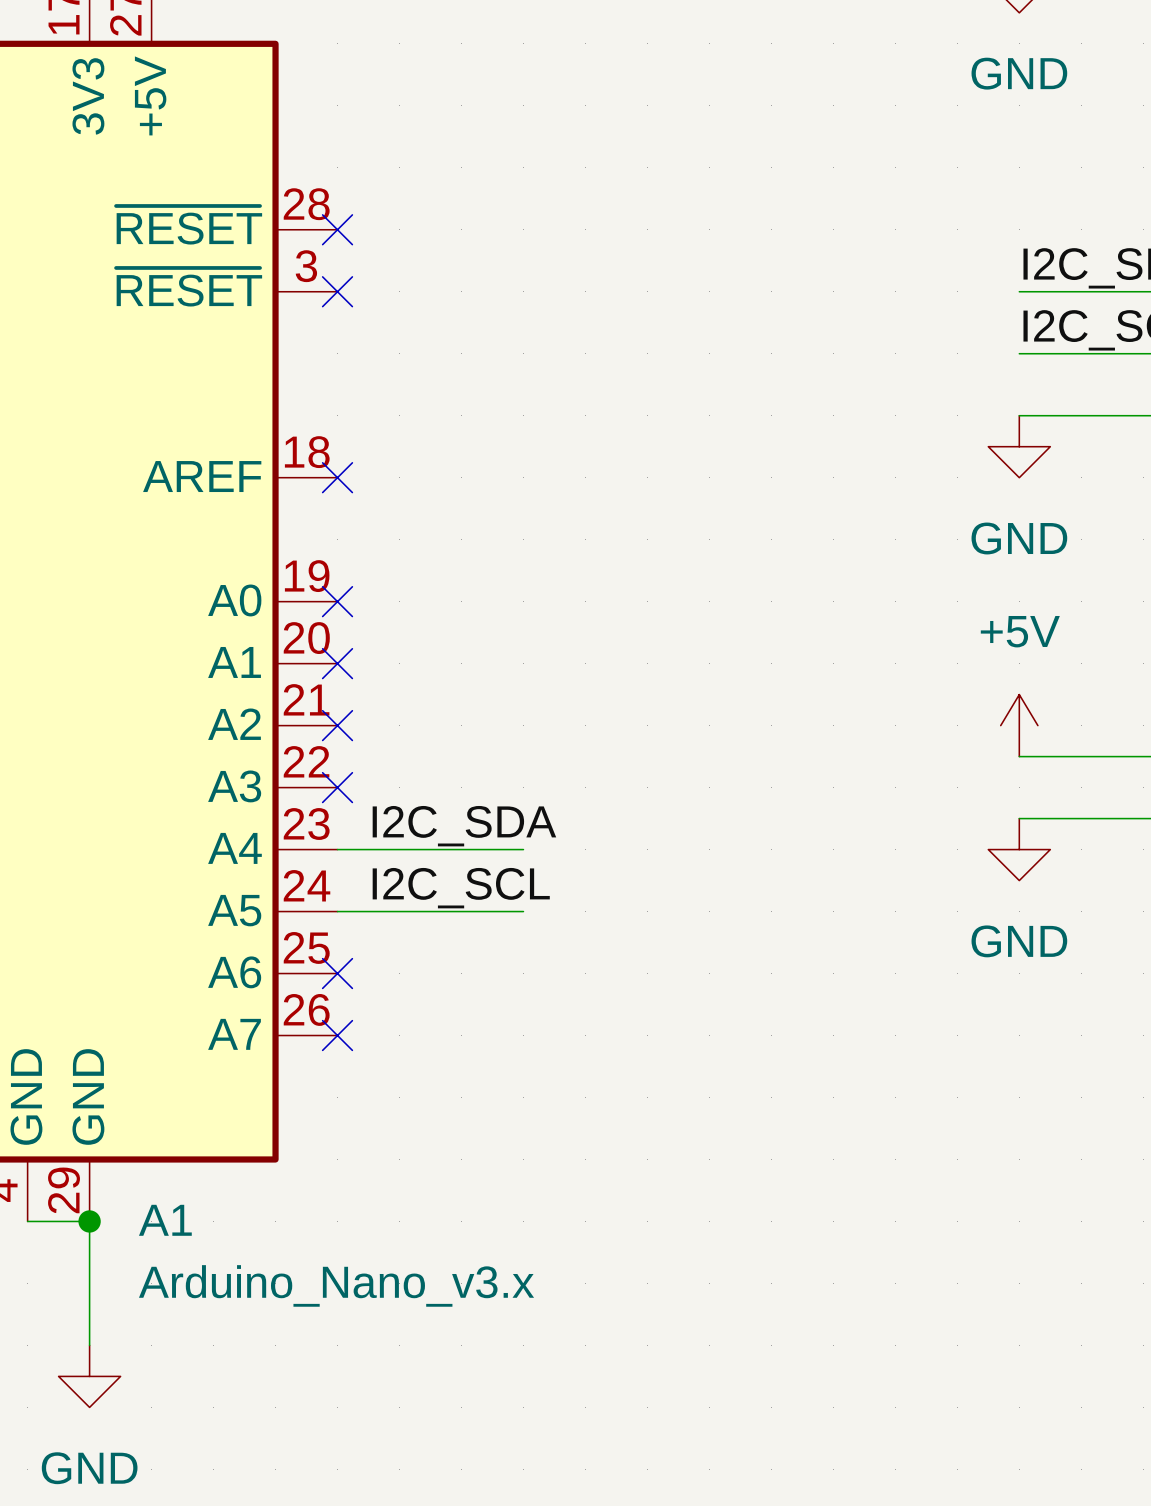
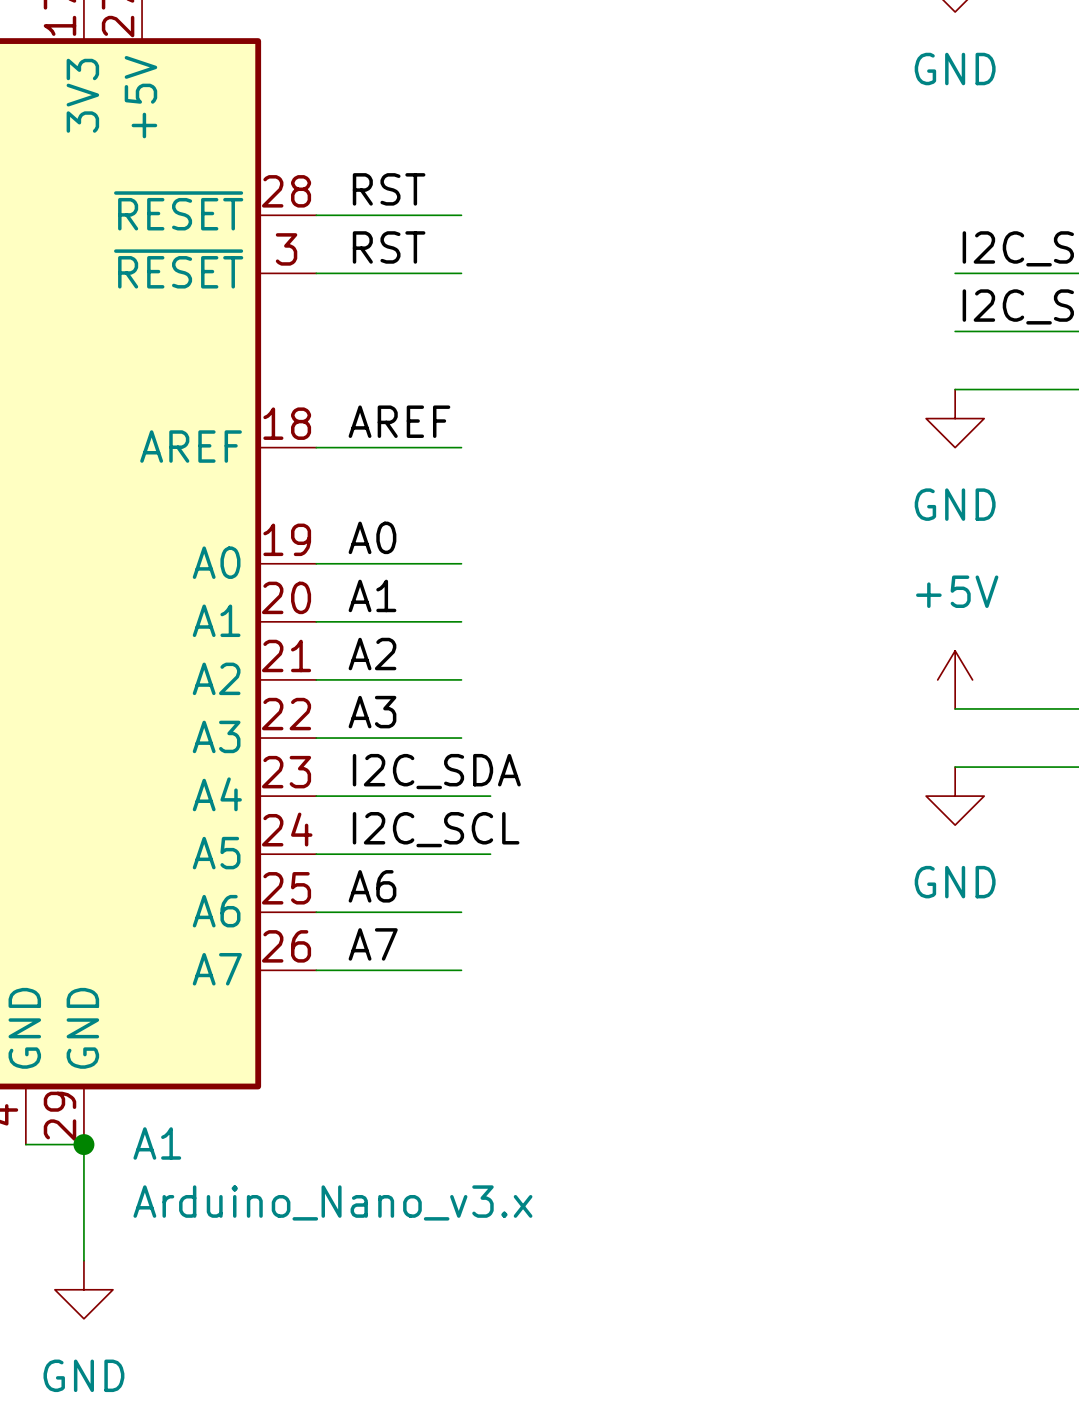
label: none -> RST (389, 189)
wire: none -> (316, 215) (461, 215)
no-connect mark: (337, 229) -> none
label: none -> RST (389, 247)
wire: none -> (316, 273) (461, 273)
no-connect mark: (337, 291) -> none
label: none -> AREF (399, 421)
wire: none -> (316, 447) (461, 447)
no-connect mark: (337, 477) -> none
label: none -> A0 (372, 537)
wire: none -> (316, 563) (461, 563)
no-connect mark: (337, 601) -> none
label: none -> A1 (372, 595)
wire: none -> (316, 621) (461, 621)
no-connect mark: (337, 663) -> none
label: none -> A2 (372, 654)
wire: none -> (316, 679) (461, 679)
no-connect mark: (337, 725) -> none
label: none -> A3 (372, 712)
wire: none -> (316, 738) (461, 738)
no-connect mark: (337, 787) -> none
label: none -> A6 (372, 886)
wire: none -> (316, 912) (461, 912)
no-connect mark: (337, 973) -> none
label: none -> A7 (373, 944)
wire: none -> (316, 970) (461, 970)
no-connect mark: (337, 1035) -> none

